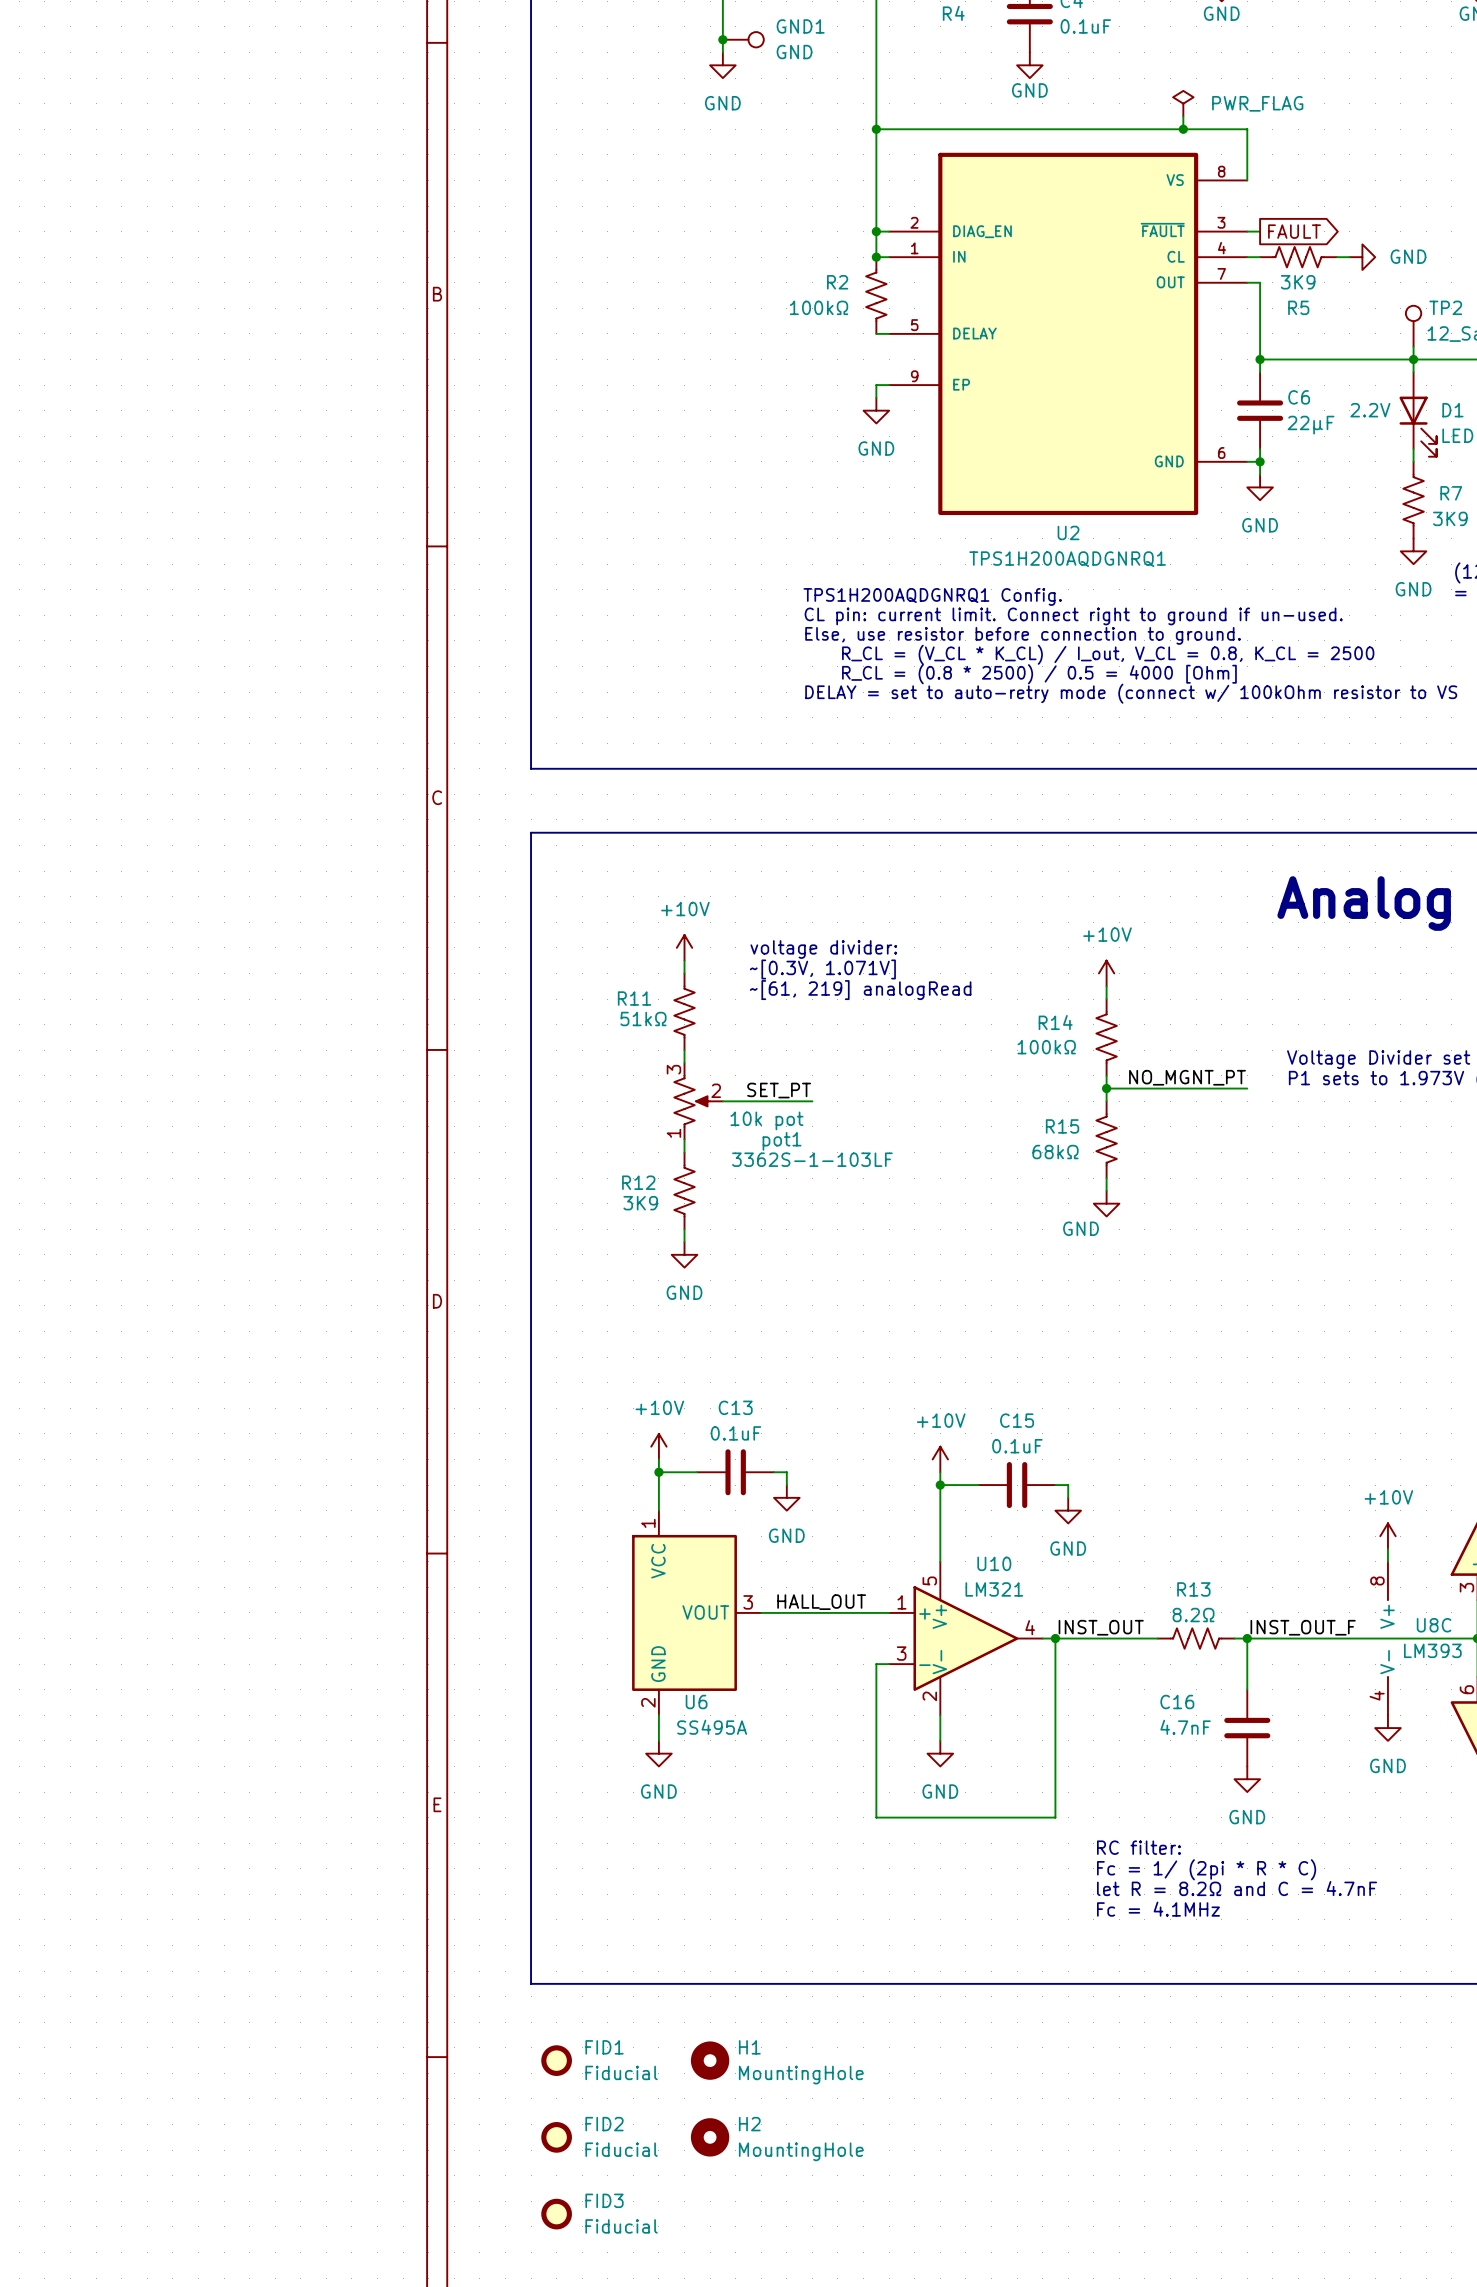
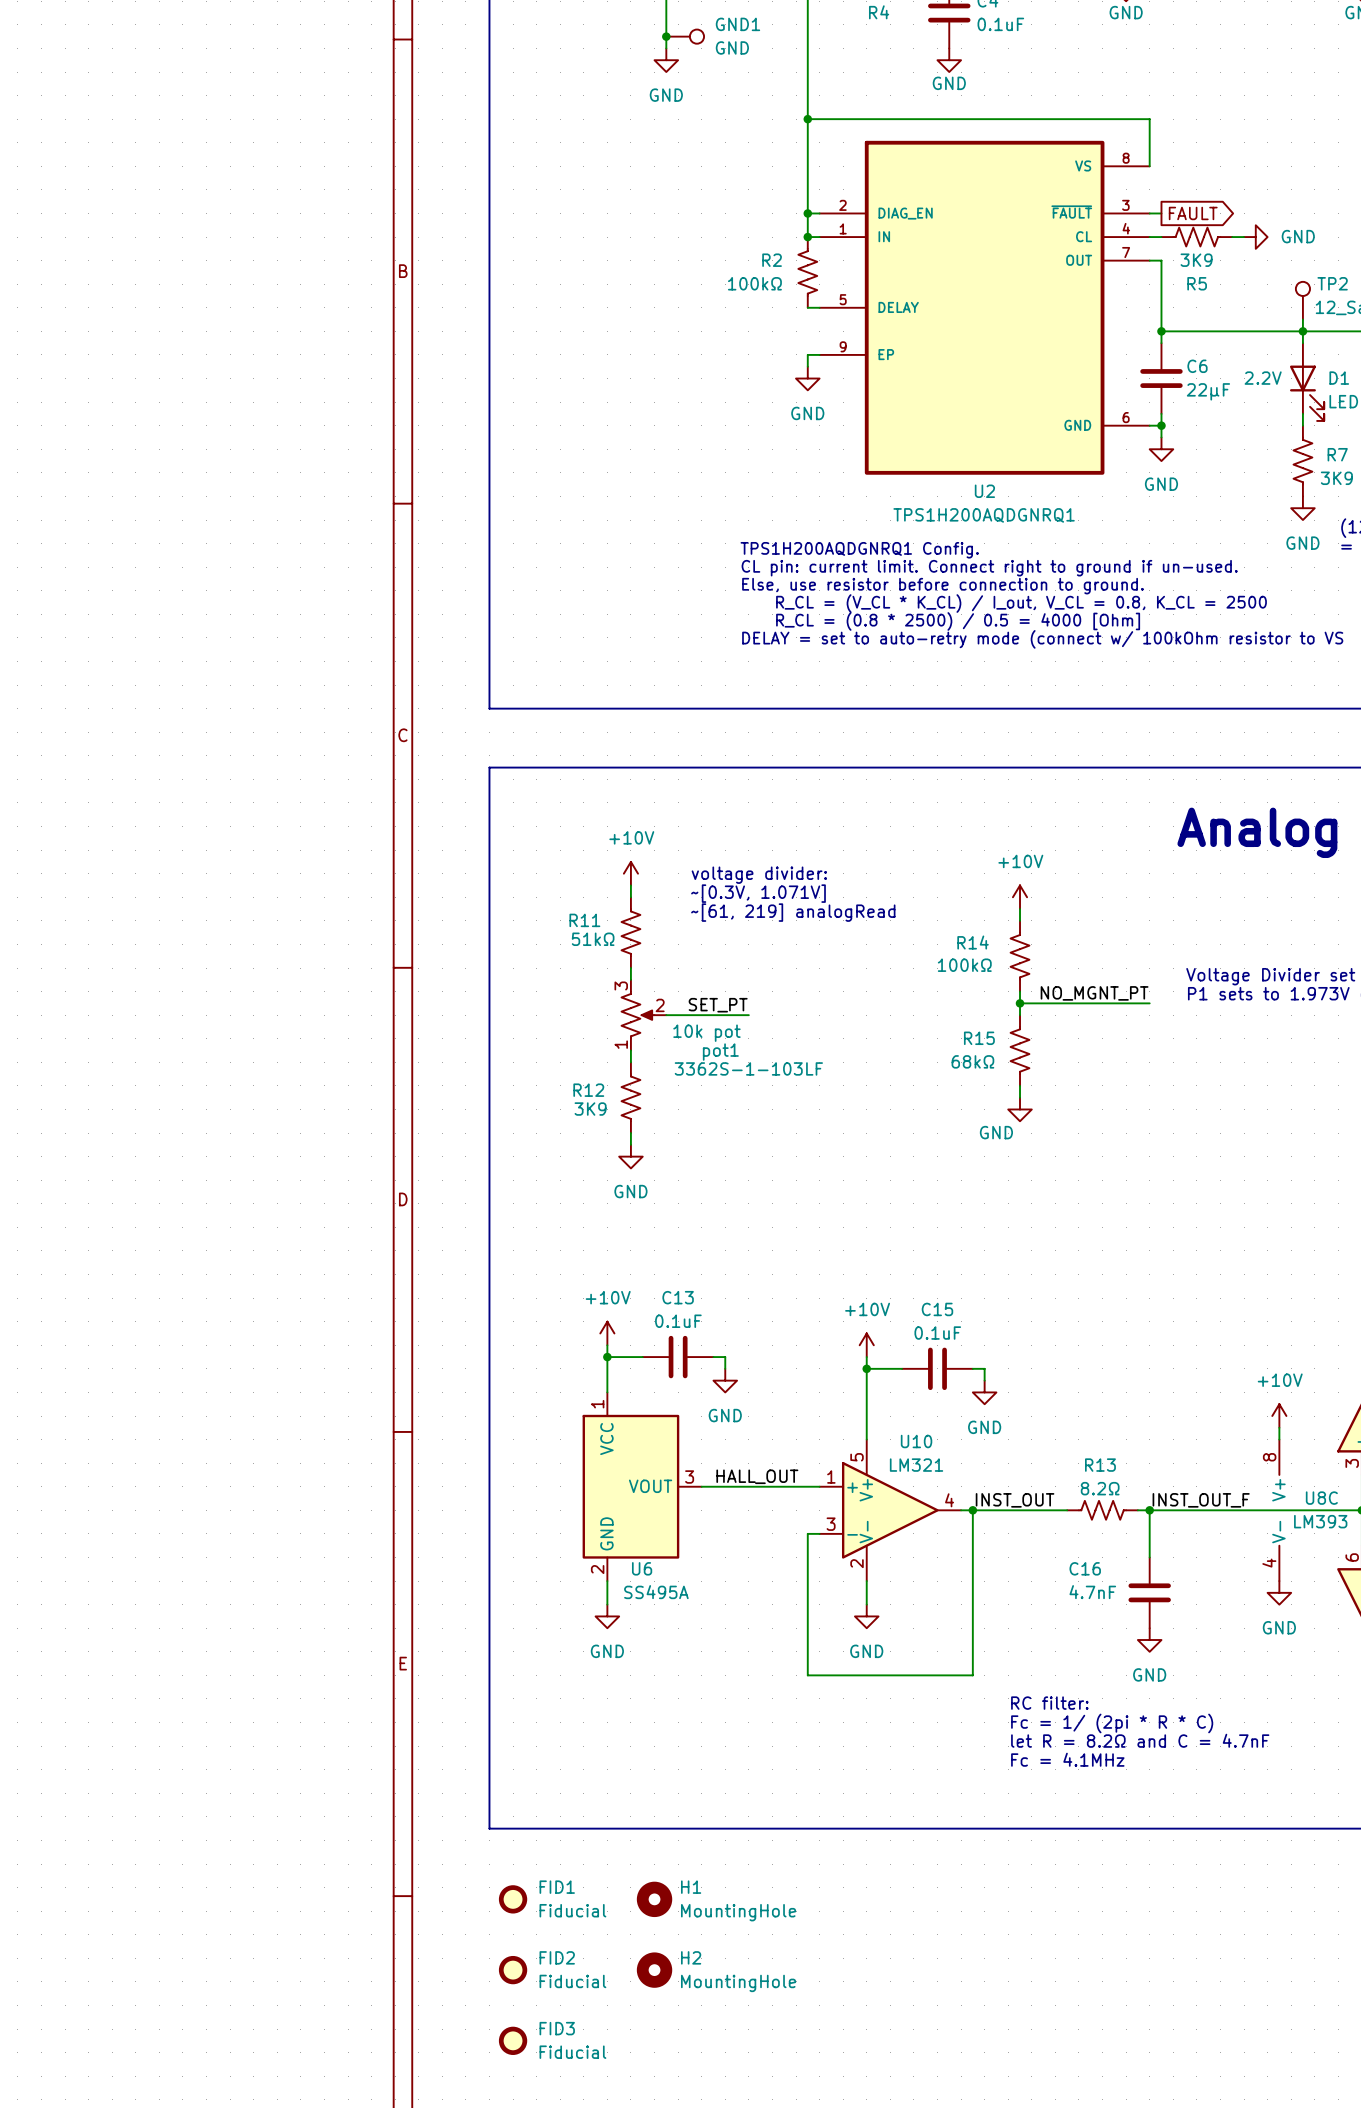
power symbol: PWR_FLAG (1183, 103) -> none
wire: (1183, 116) (1183, 129) -> none
junction: (1183, 129) -> none

